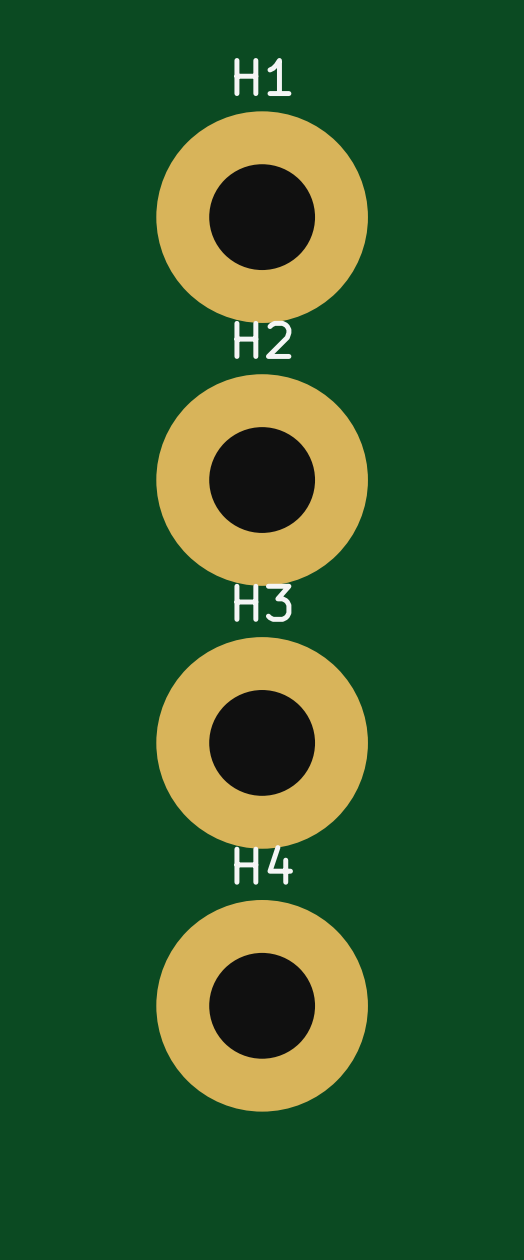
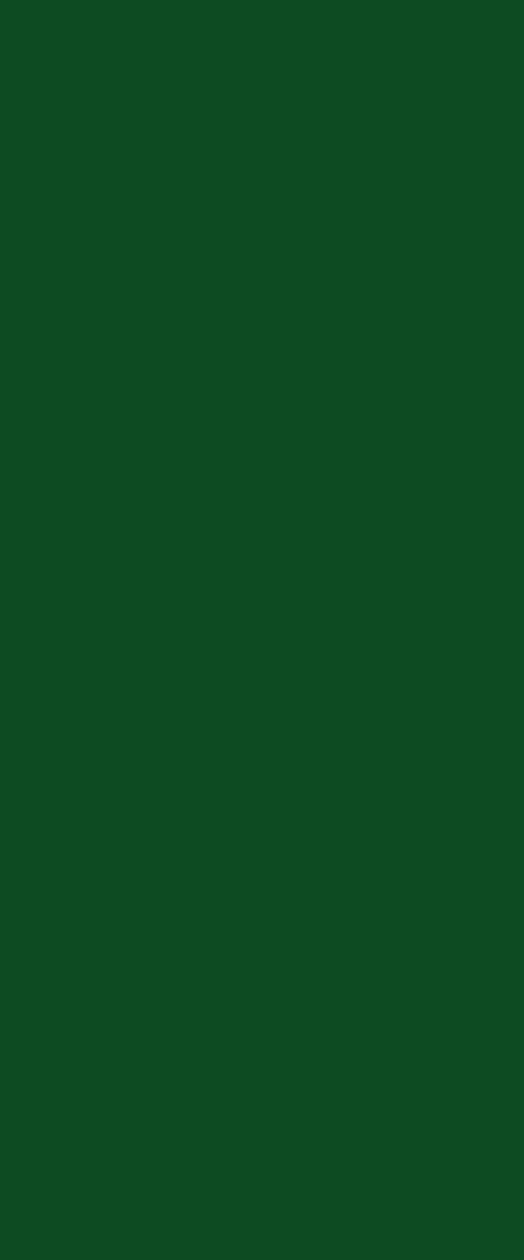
H1: (262, 217) -> none
H2: (262, 480) -> none
H3: (262, 742) -> none
H4: (262, 1005) -> none

